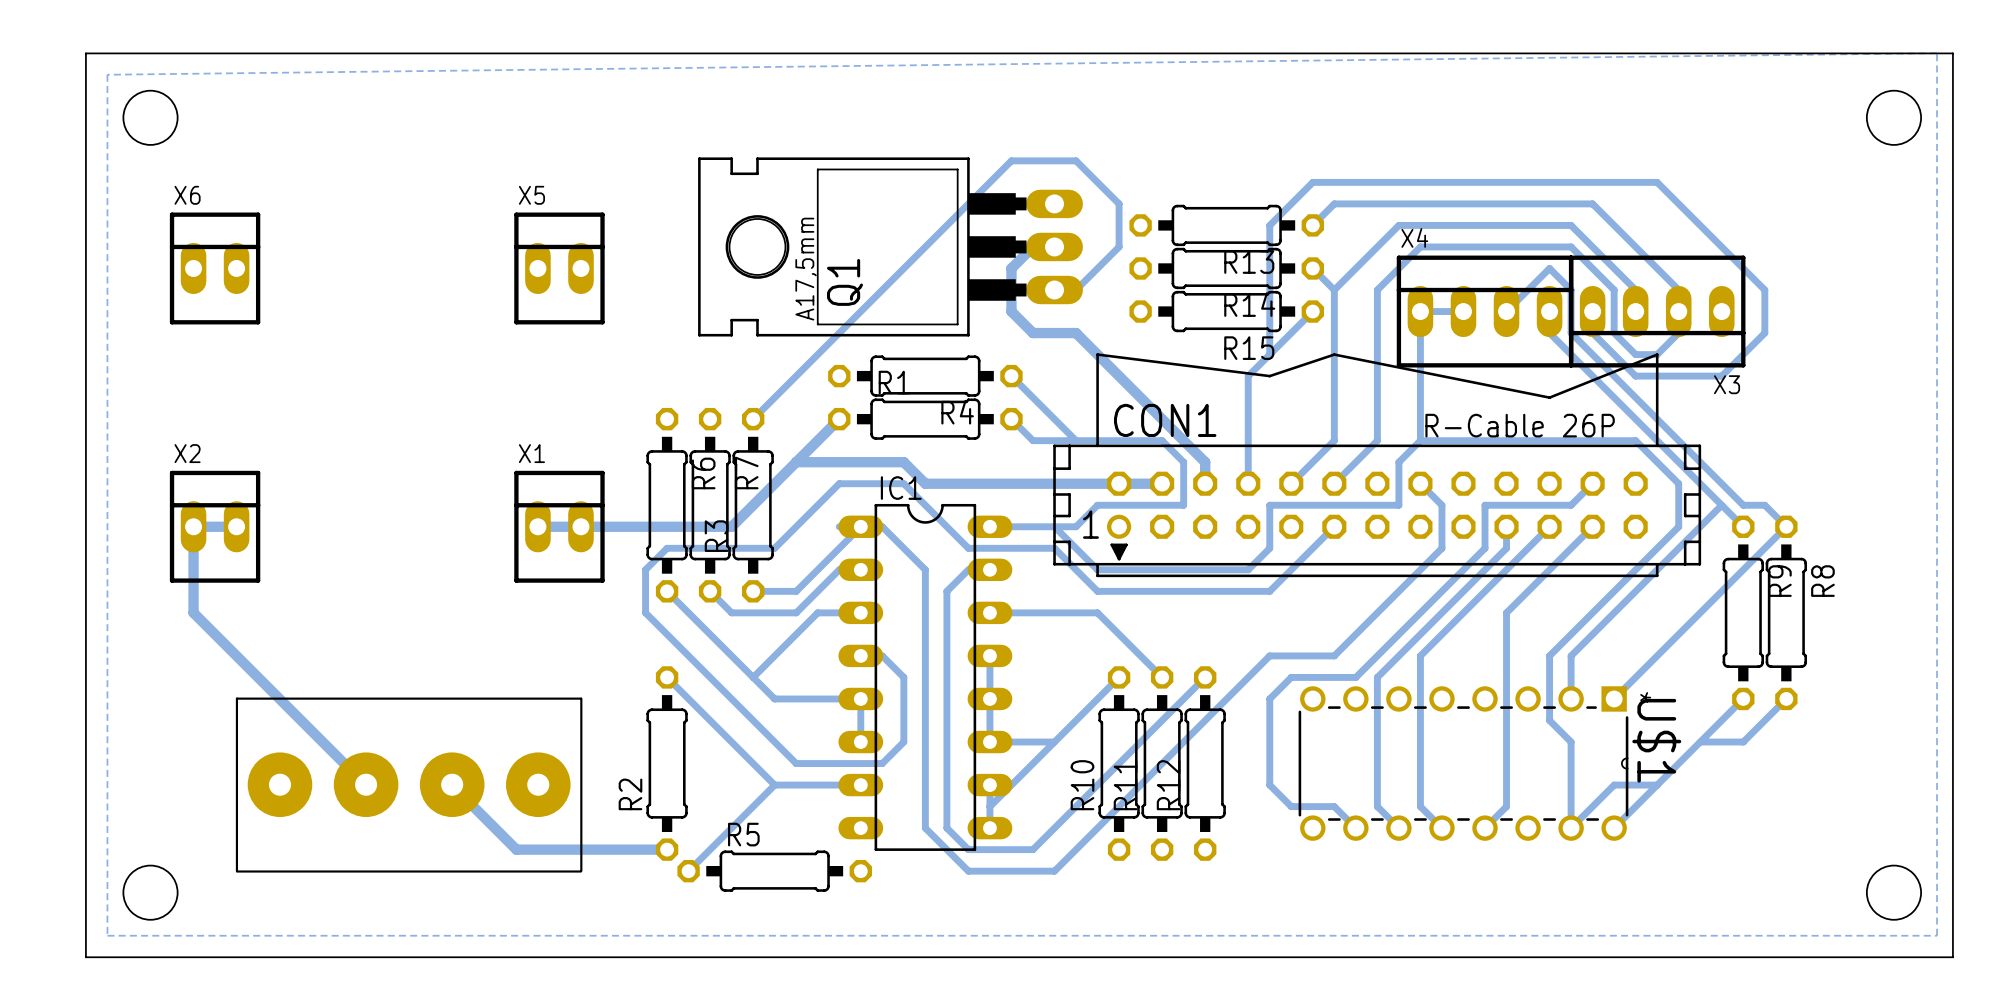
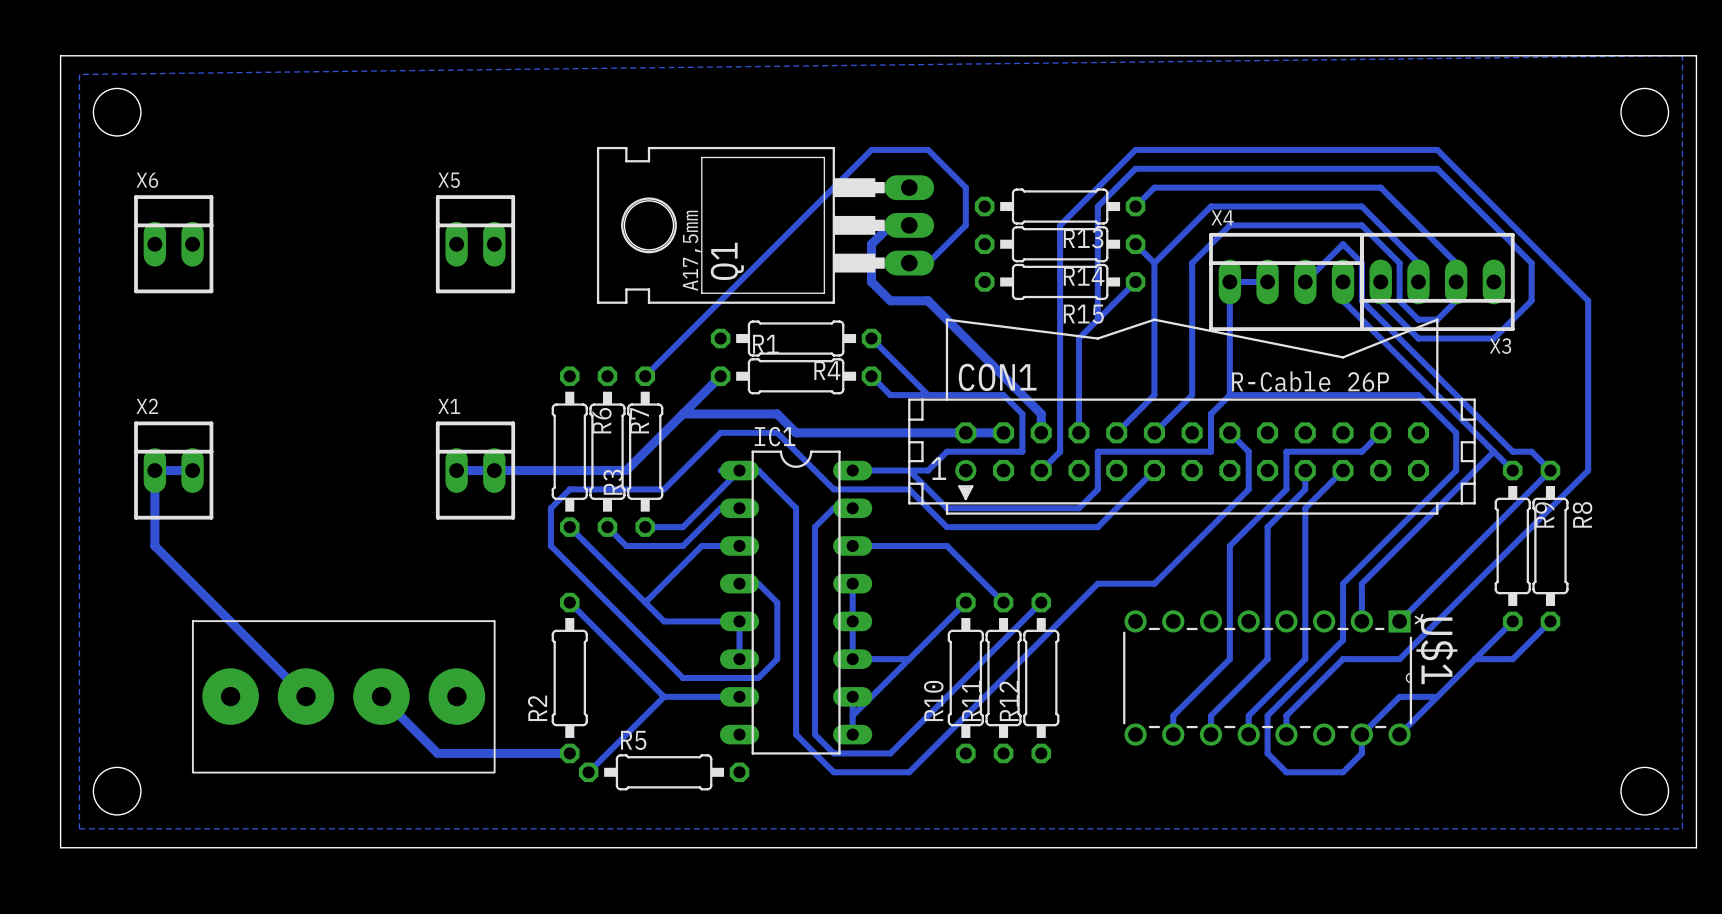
bottom track: none -> (1041, 470) (1060, 451) (1060, 225) (1135, 149) (1437, 149) (1588, 300) (1588, 470) (1399, 659) (1343, 659) (1286, 715) (1286, 734)
bottom track: (1592, 526) (1506, 612) -> none
bottom track: (1506, 569) (1420, 655) -> (1305, 508) (1305, 545)
bottom track: (1463, 591) (1377, 677) (1377, 806) (1398, 828) -> (1267, 527) (1267, 659) (1211, 715) (1211, 734)
bottom track: (1420, 612) (1355, 677) (1291, 677) (1269, 698) (1269, 785) (1291, 806) (1334, 806) (1355, 828) -> (1229, 545) (1229, 583)
bottom track: (1549, 720) (1571, 742) (1571, 828) -> (1343, 640) (1267, 715) (1267, 753) (1286, 772) (1343, 772) (1361, 753) (1361, 734)
bottom track: (1420, 742) (1420, 806) (1441, 828) -> (1229, 659) (1173, 715) (1173, 734)
bottom track: (1506, 742) (1506, 806) (1485, 828) -> (1305, 659) (1248, 715) (1248, 734)

